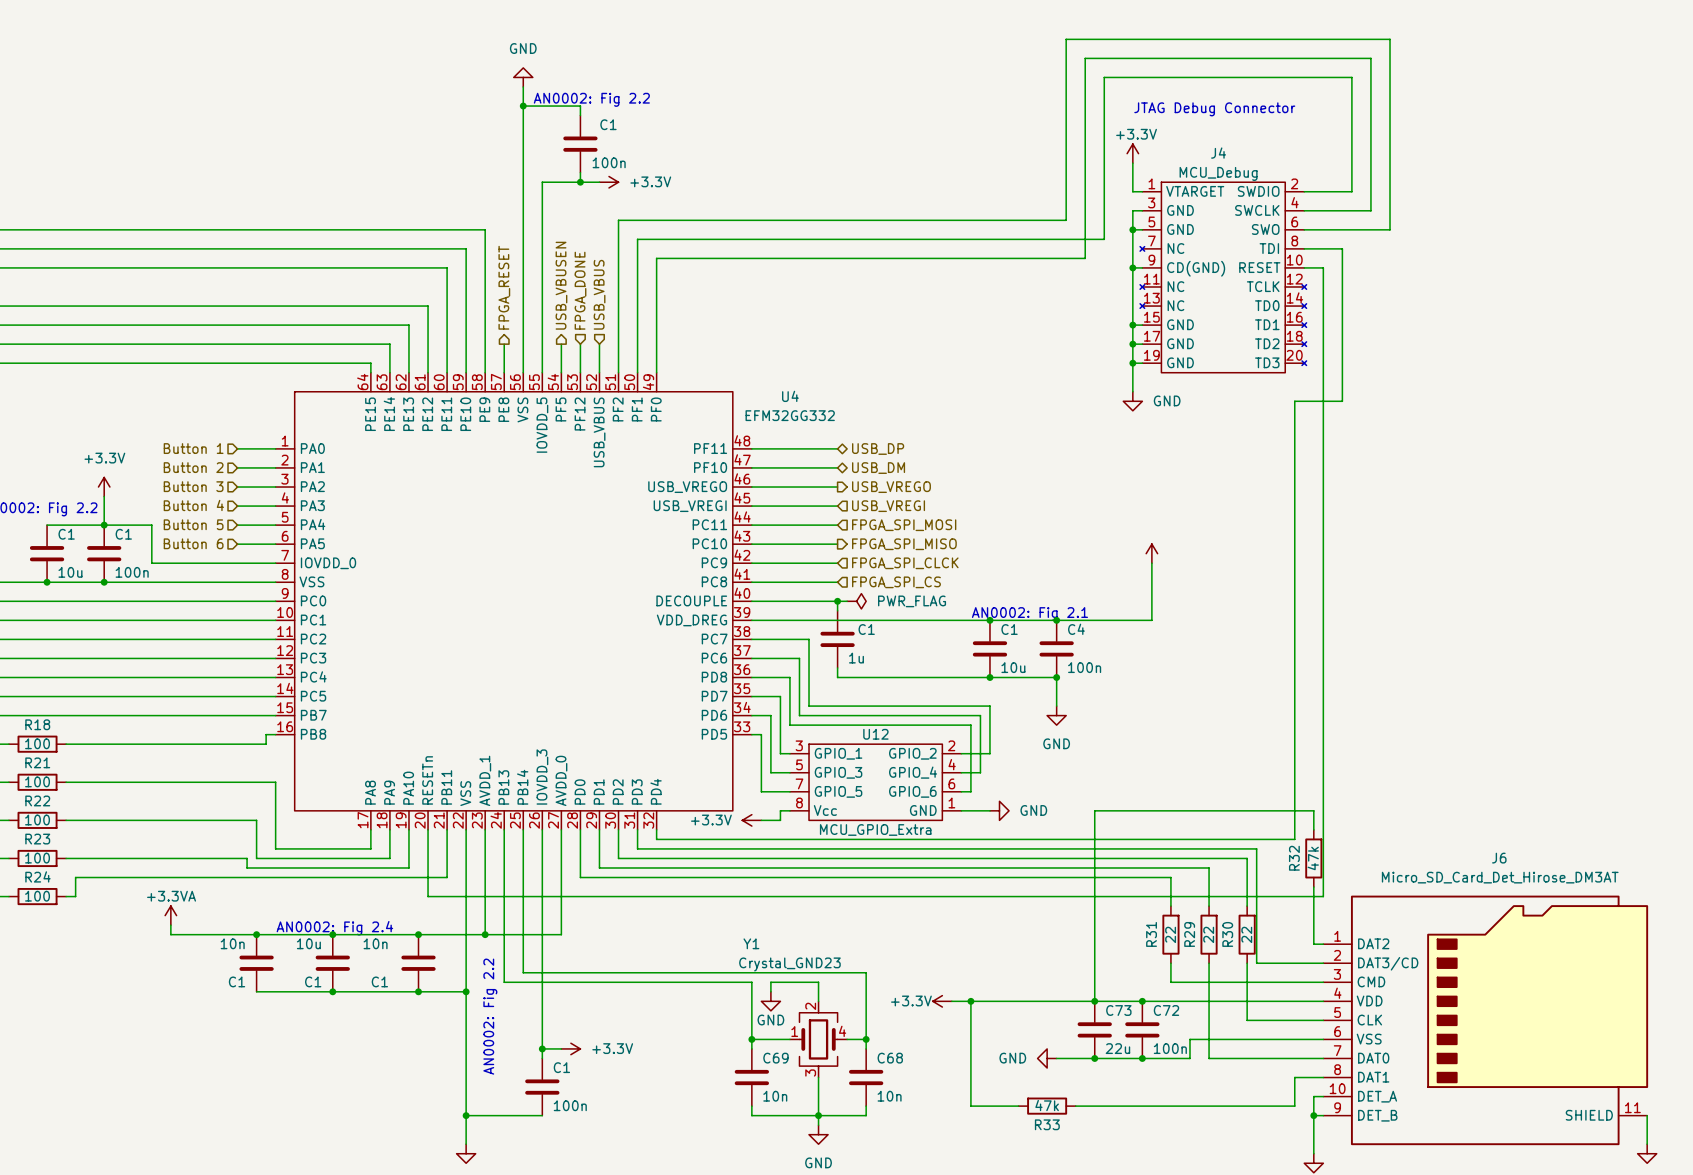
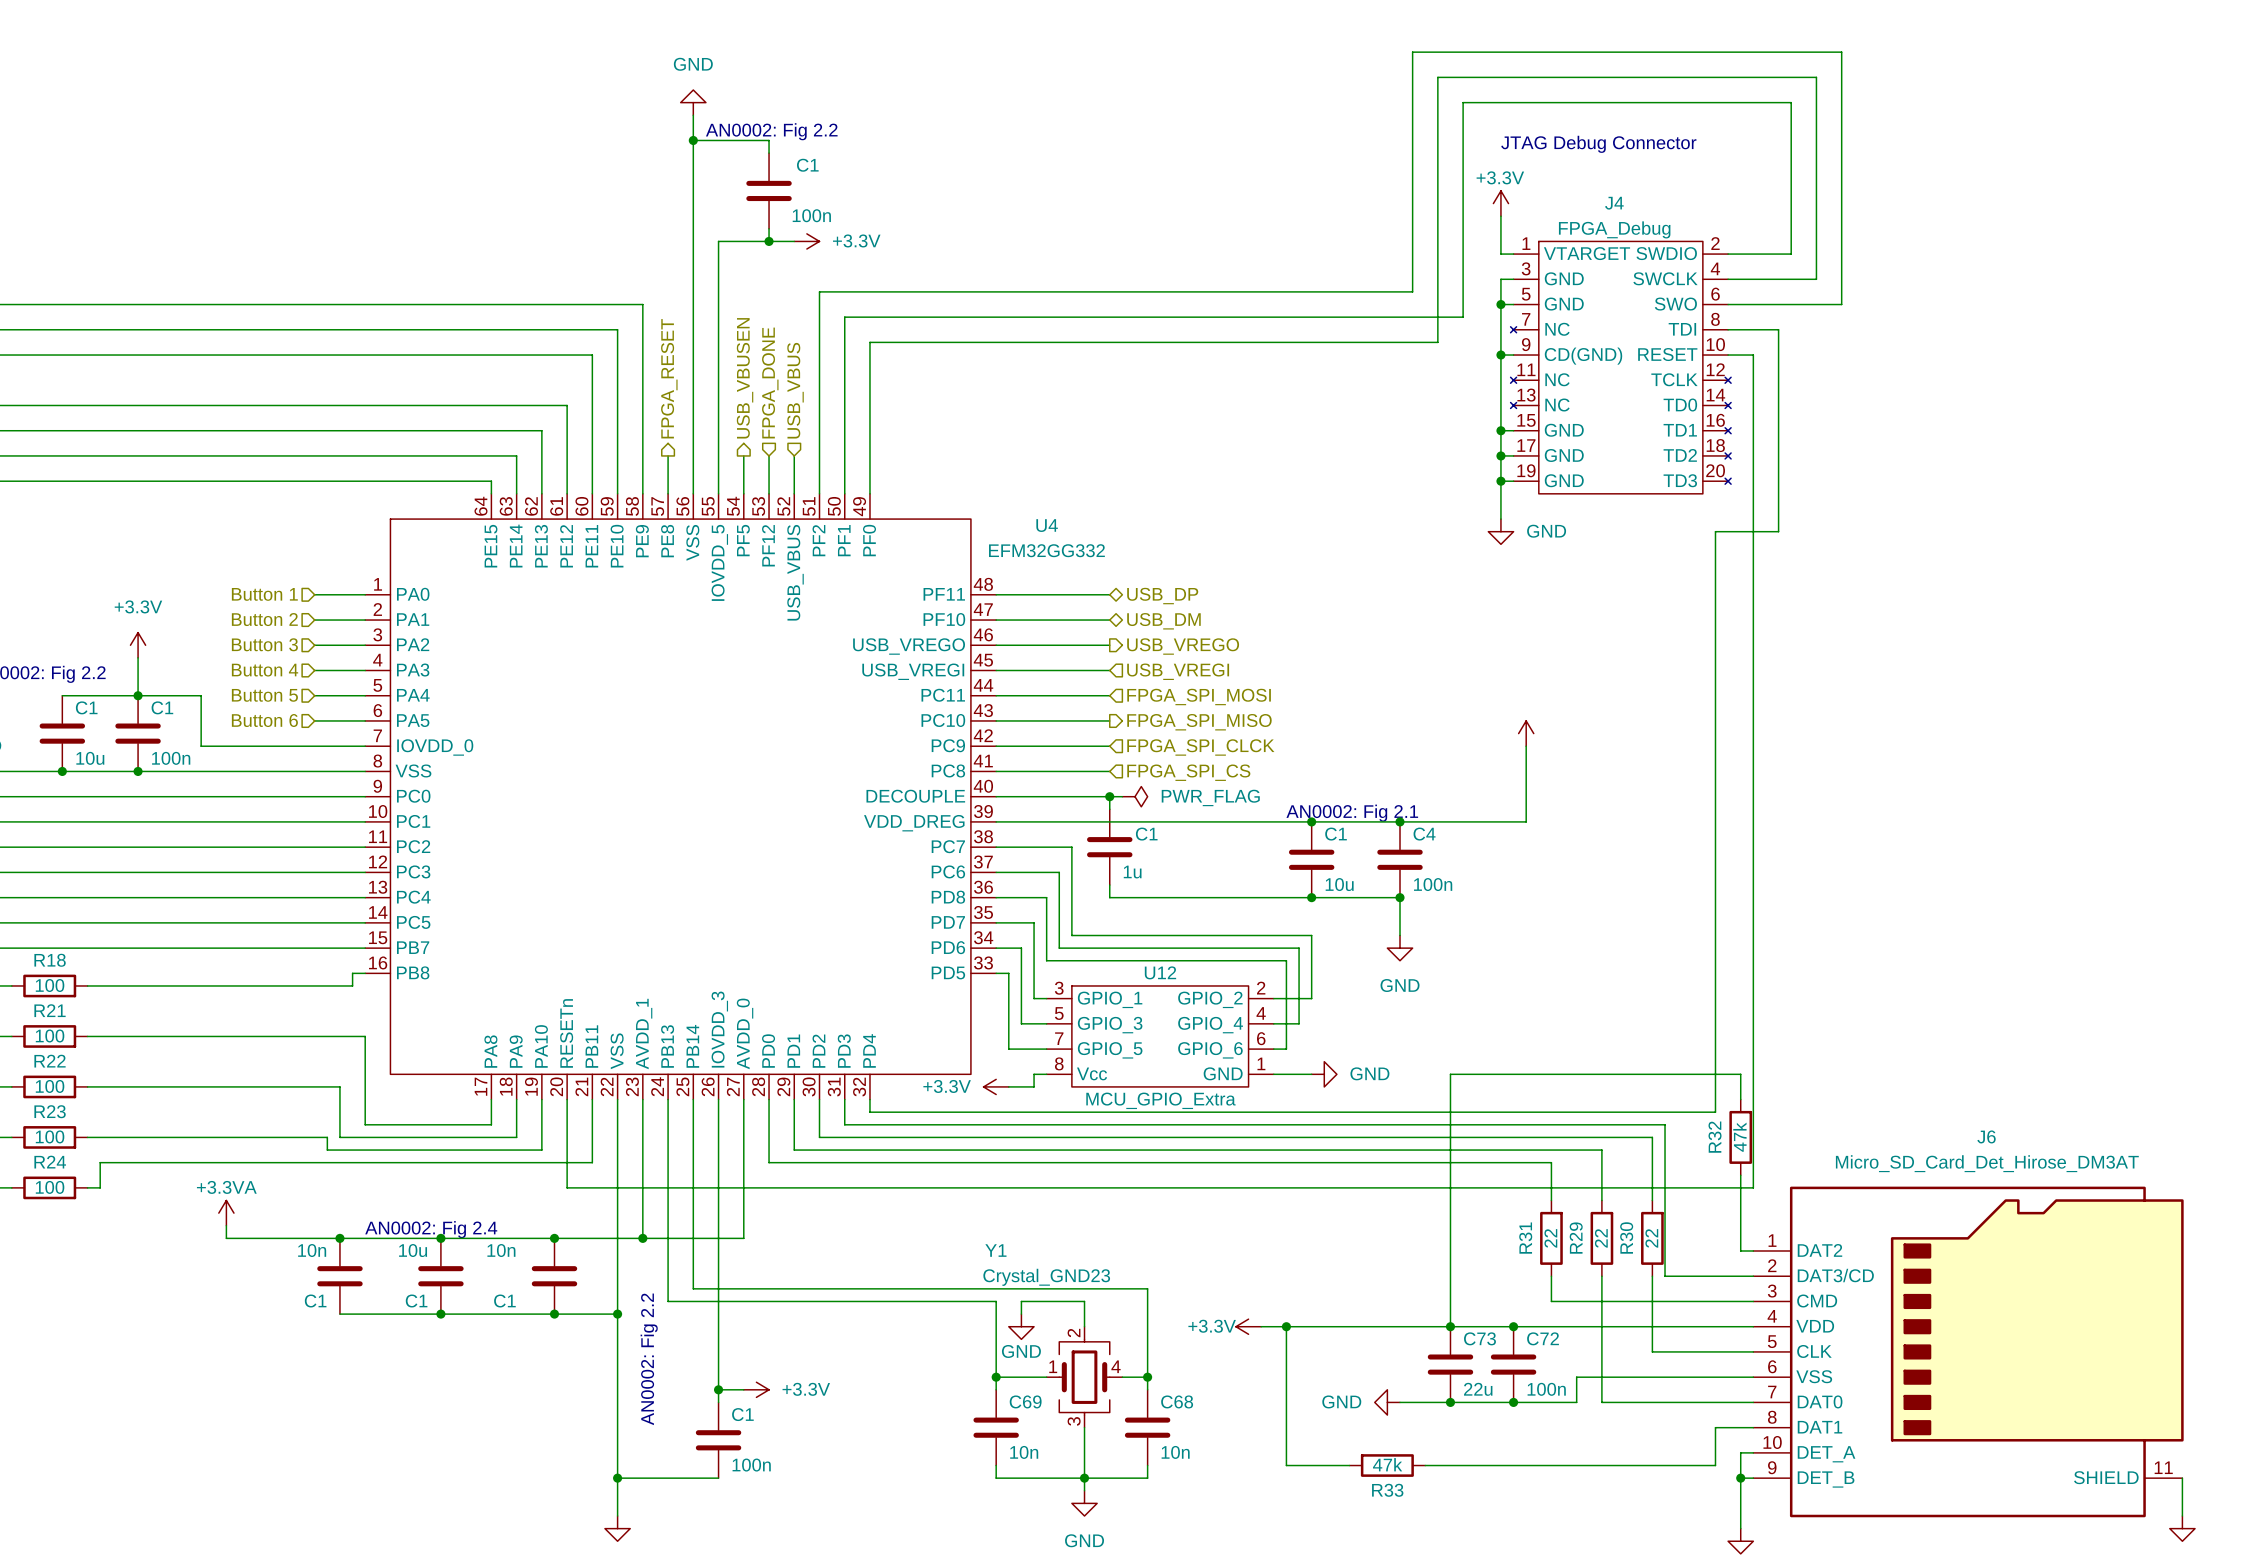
J4 value: MCU_Debug (1218, 173) -> FPGA_Debug (1614, 229)

